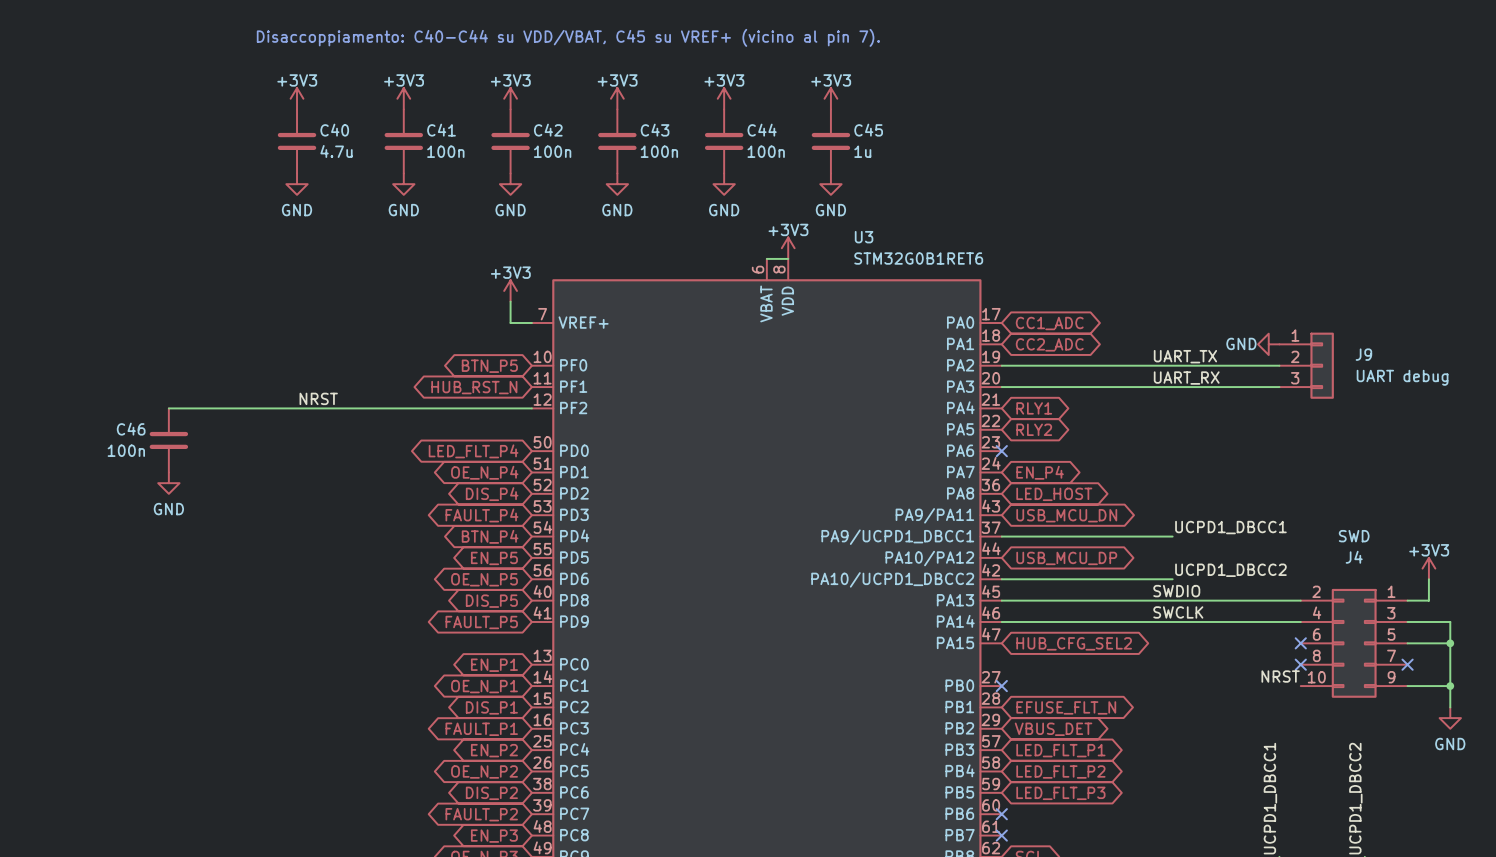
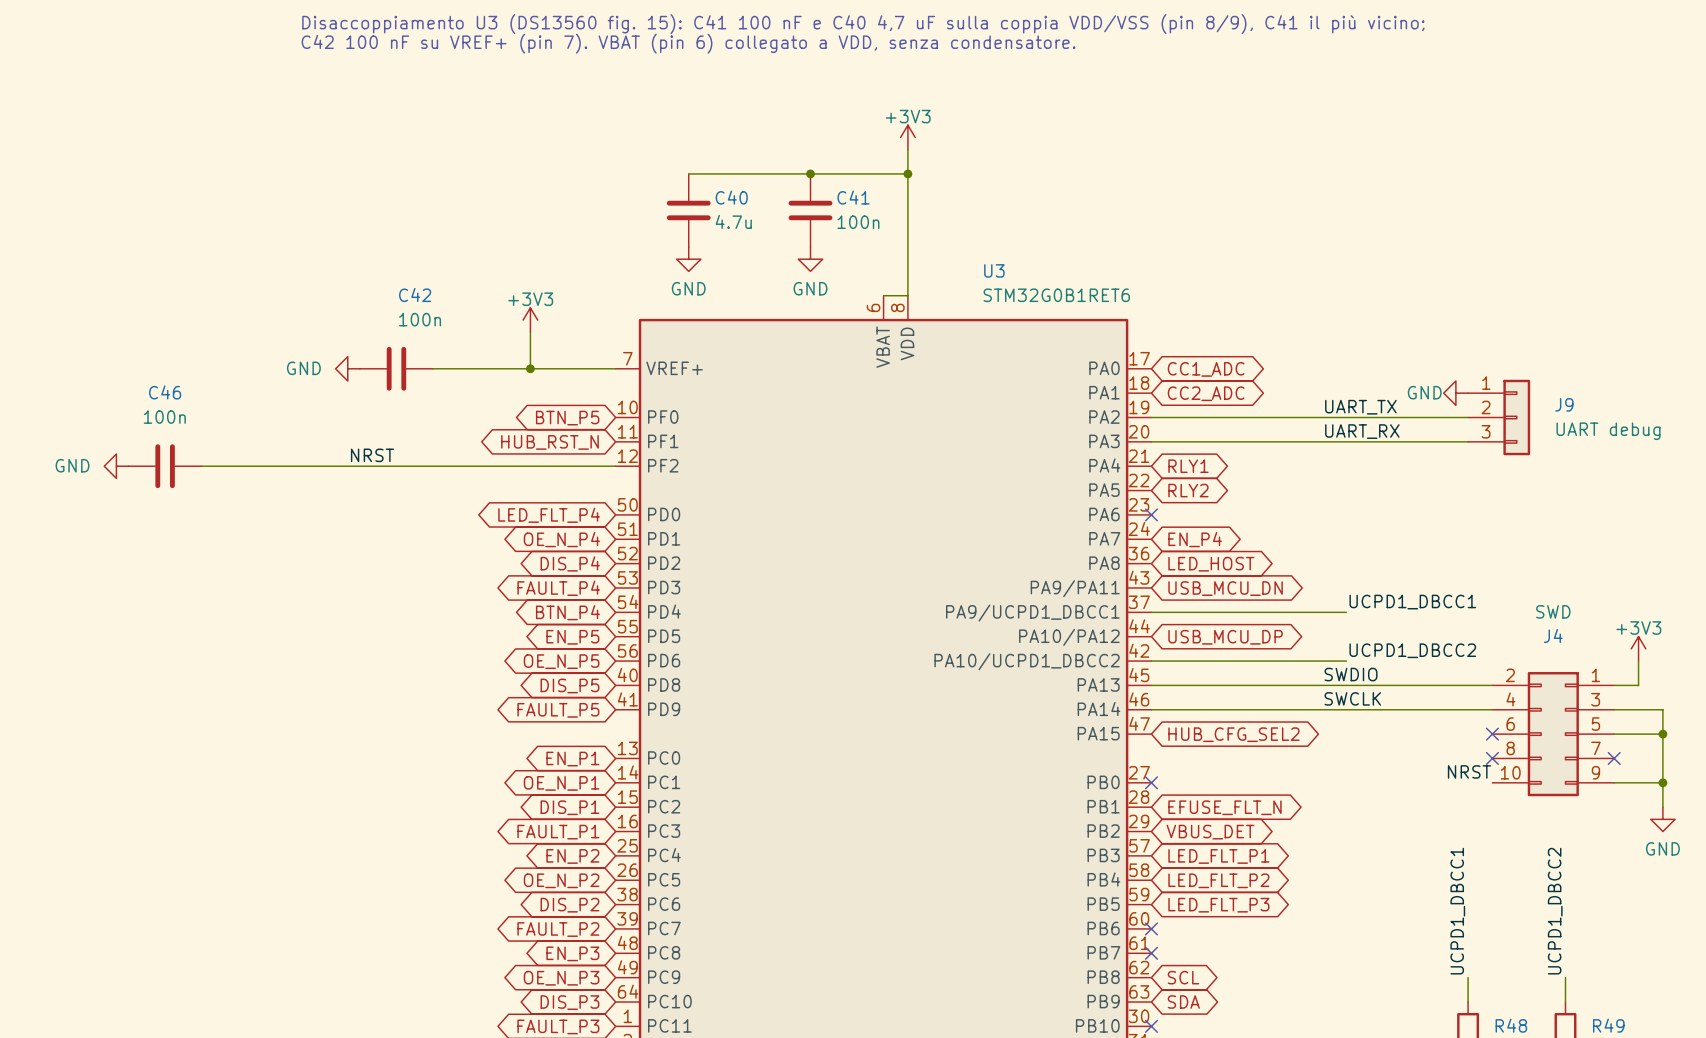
text: none -> Disaccoppiamento U3 (DS13560 fig. 15): C41 100 nF e C40 4,7 uF sulla coppia VDD/VSS (pin 8/9), C41 il più vicino; (863, 24)
text: Disaccoppiamento: C40-C44 su VDD/VBAT, C45 su VREF+ (vicino al pin 7). (568, 37) -> C42 100 nF su VREF+ (pin 7). VBAT (pin 6) collegato a VDD, senza condensatore. (688, 43)
power symbol: +3V3 (297, 98) -> none
power symbol: +3V3 (403, 98) -> none
power symbol: +3V3 (510, 98) -> none
power symbol: +3V3 (617, 98) -> none
power symbol: +3V3 (724, 98) -> none
power symbol: +3V3 (830, 98) -> none
power symbol: none -> +3V3 (907, 137)
C42 name position: C42 (548, 130) -> C42 (415, 294)
wire: none -> (907, 149) (907, 295)
C40 position: (297, 141) -> (688, 210)
C41 position: (403, 141) -> (810, 210)
C42 rotation: 0° (510, 141) -> 90° clockwise (396, 368)
C42 position: (510, 141) -> (396, 368)
C43: 100n (617, 141) -> none
C44: 100n (724, 141) -> none
C45: 1u (830, 141) -> none
C42 value position: 100n (552, 151) -> 100n (420, 319)
wire: none -> (688, 173) (907, 173)
junction: none -> (810, 173)
junction: none -> (907, 173)
power symbol: GND (297, 184) -> none
power symbol: GND (403, 184) -> none
power symbol: GND (510, 184) -> none
power symbol: GND (617, 184) -> none
power symbol: GND (724, 184) -> none
power symbol: GND (830, 184) -> none
power symbol: none -> GND (688, 259)
power symbol: none -> GND (810, 259)
power symbol: +3V3 (788, 248) -> none
wire: none -> (530, 332) (530, 368)
power symbol position: +3V3 (510, 290) -> +3V3 (530, 320)
wire: (510, 301) (510, 322) -> (433, 368) (591, 368)
power symbol: none -> GND (347, 368)
junction: none -> (530, 368)
power symbol: none -> GND (116, 466)
C46 name position: C46 (131, 429) -> C46 (165, 392)
C46 rotation: 0° (168, 440) -> 90° clockwise (165, 466)
C46 position: (168, 440) -> (165, 466)
power symbol: GND (168, 483) -> none

